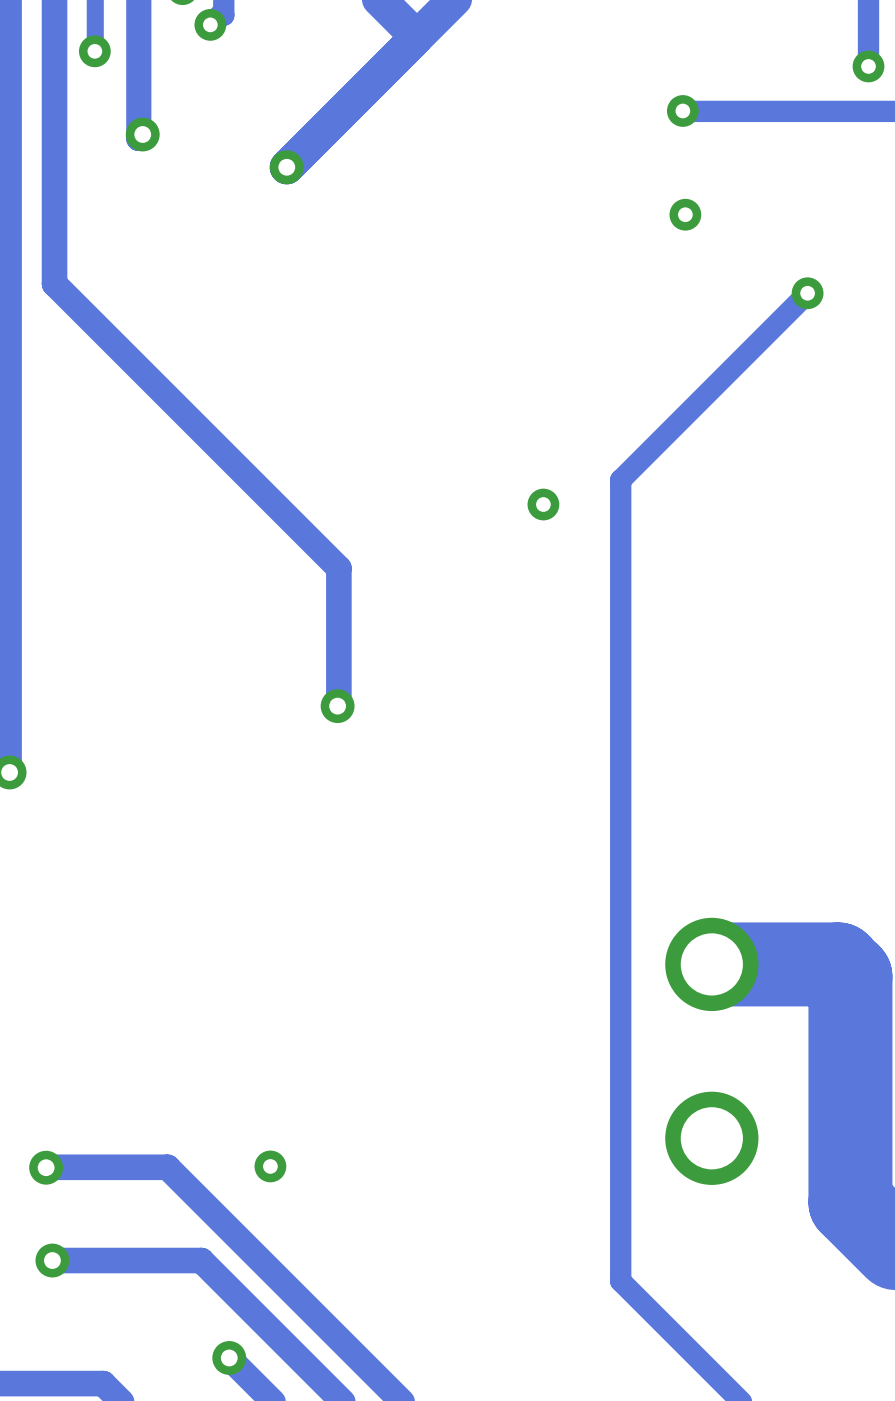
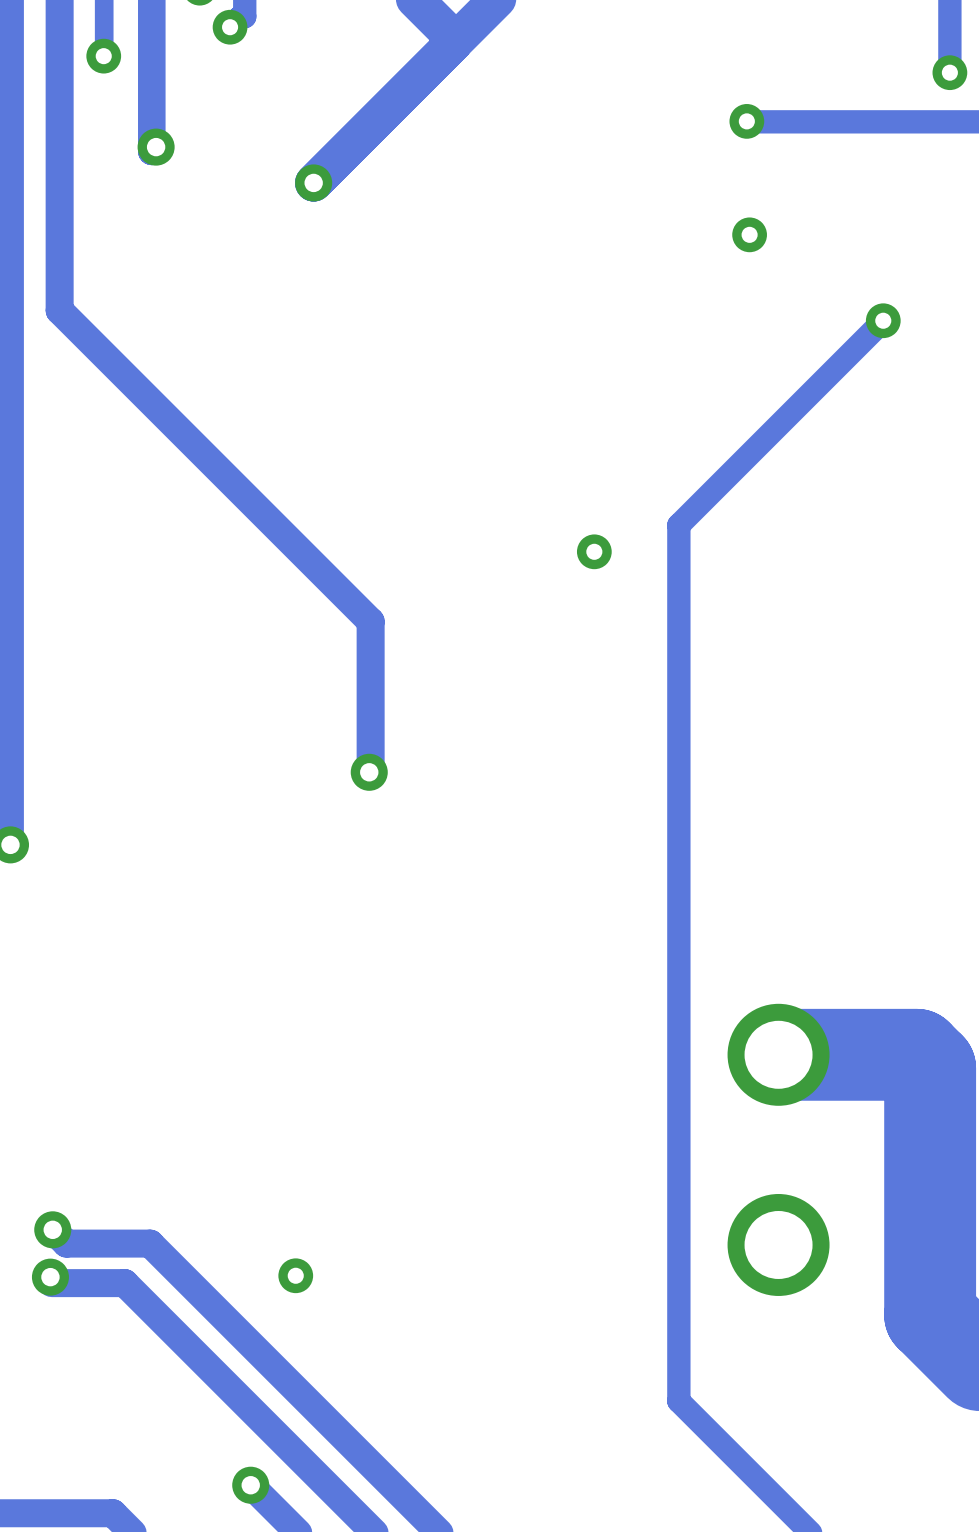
via: none -> (52, 1229)
track: (167, 1167) (46, 1167) -> (183, 1276) (150, 1243) (66, 1243) (52, 1229)
via: (52, 1260) -> none
track: (201, 1260) (52, 1260) -> (220, 1378) (124, 1283) (51, 1283)

